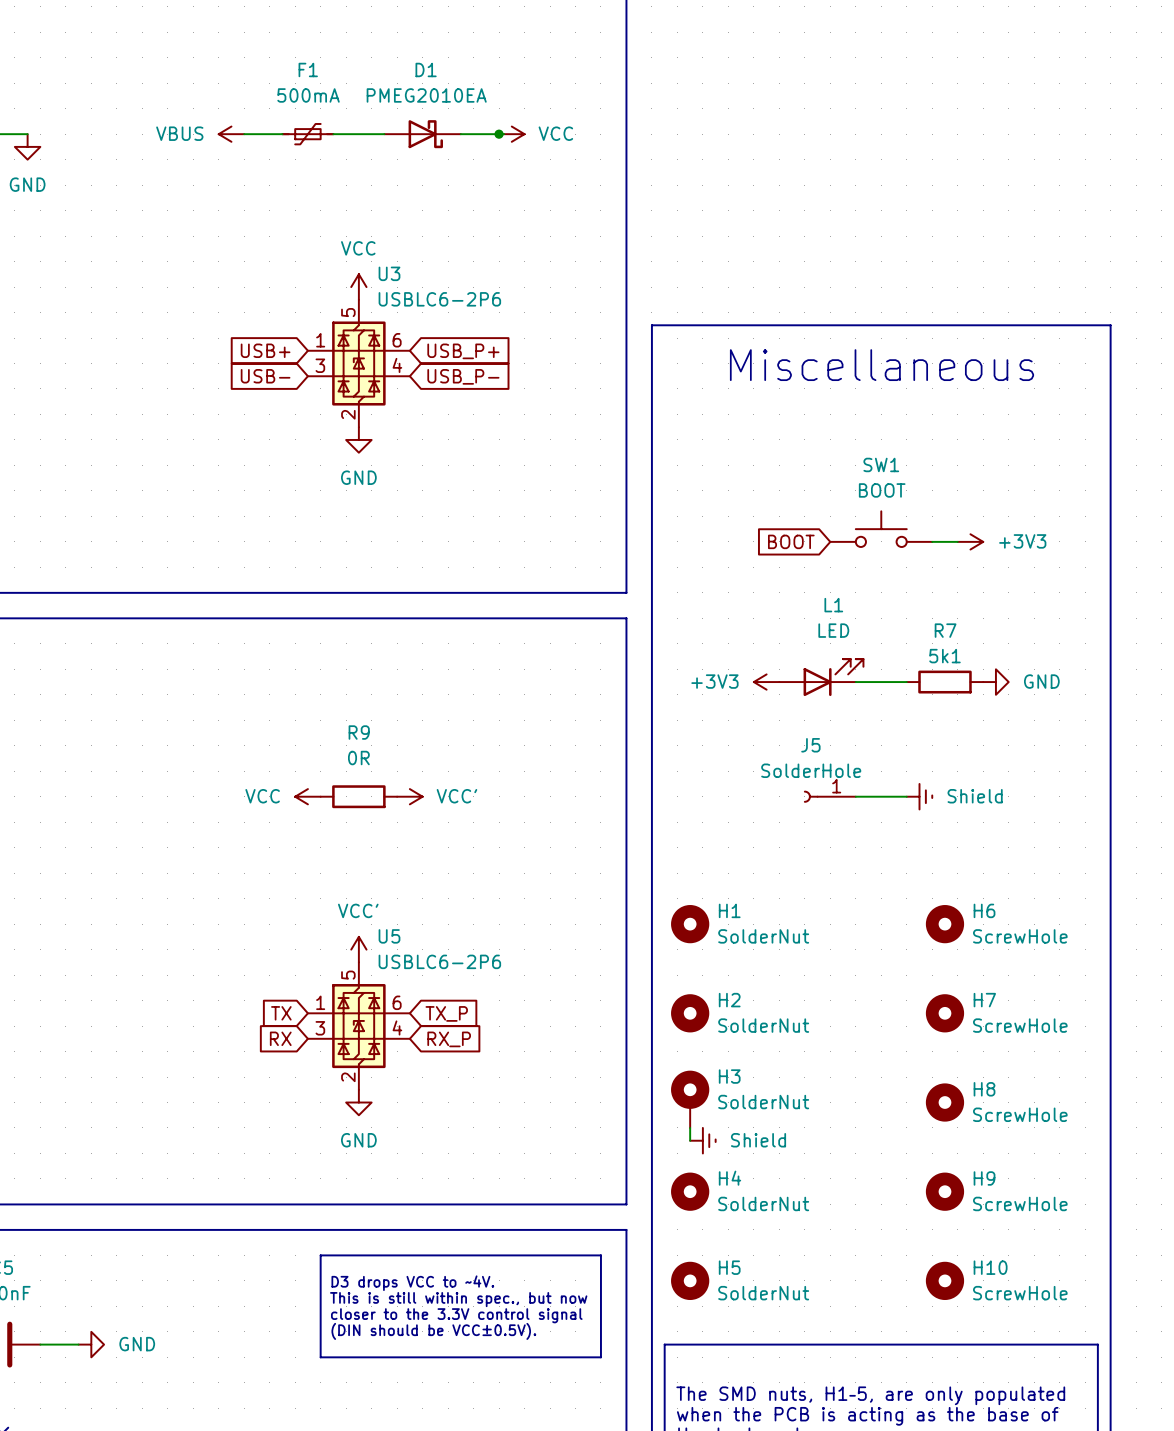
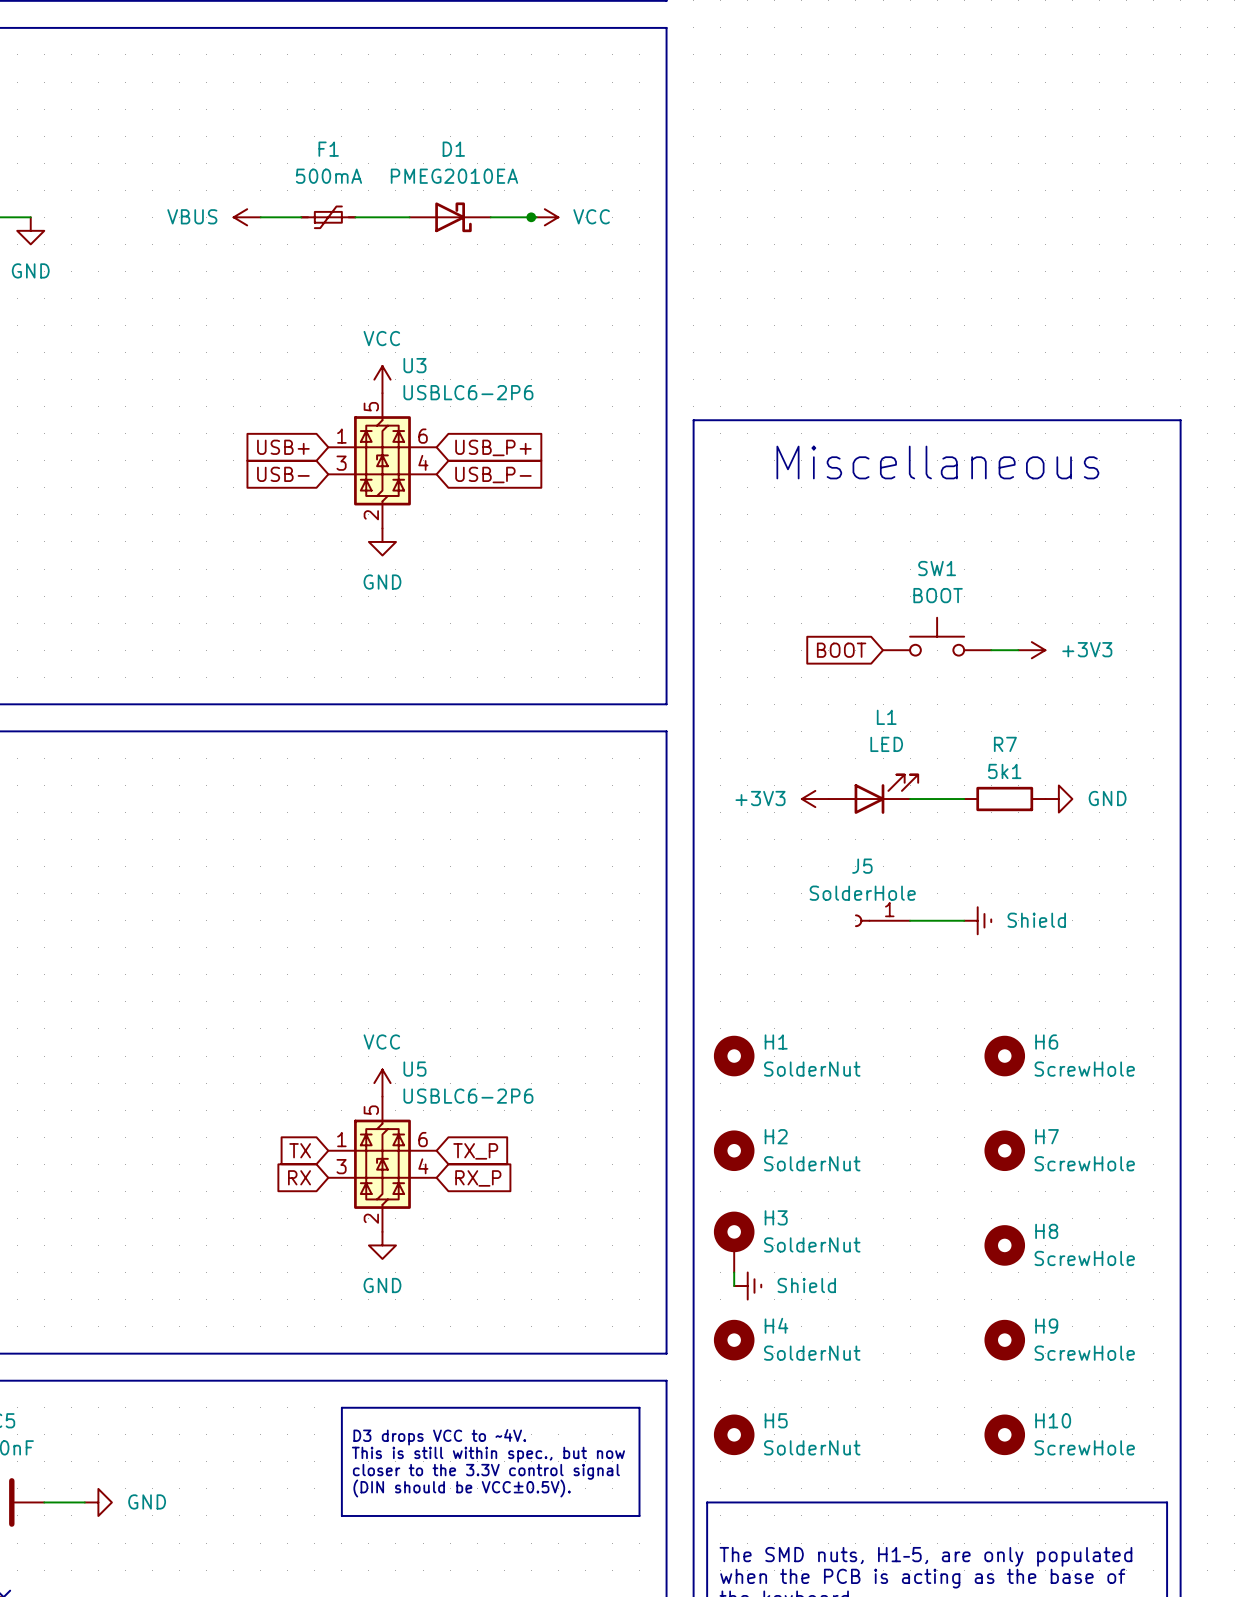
power symbol: VCC (307, 796) -> none
R9: 0R (358, 796) -> none
power symbol: VCC' (409, 796) -> none
power symbol: VCC' (358, 949) -> VCC (382, 1083)

